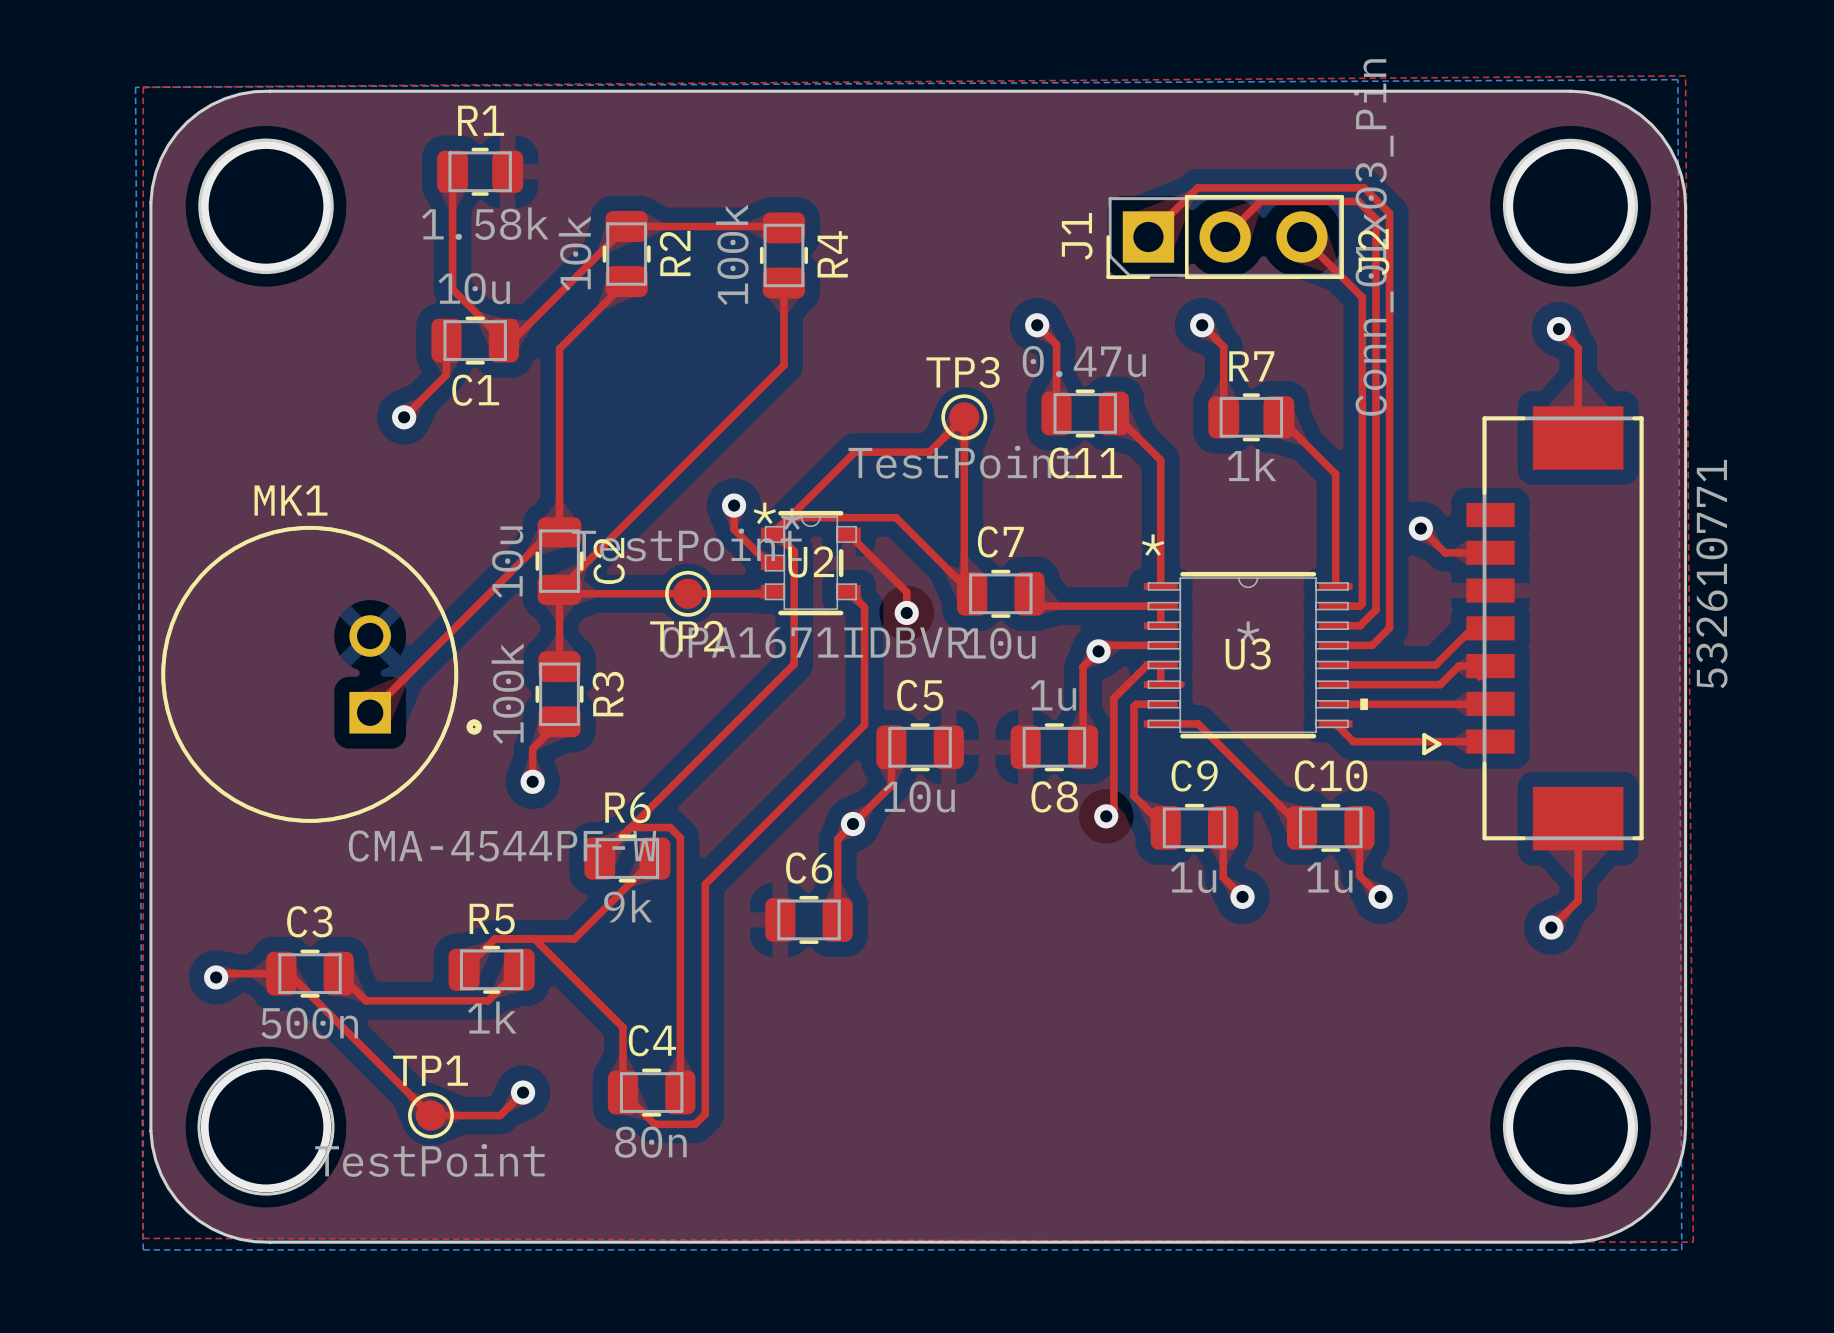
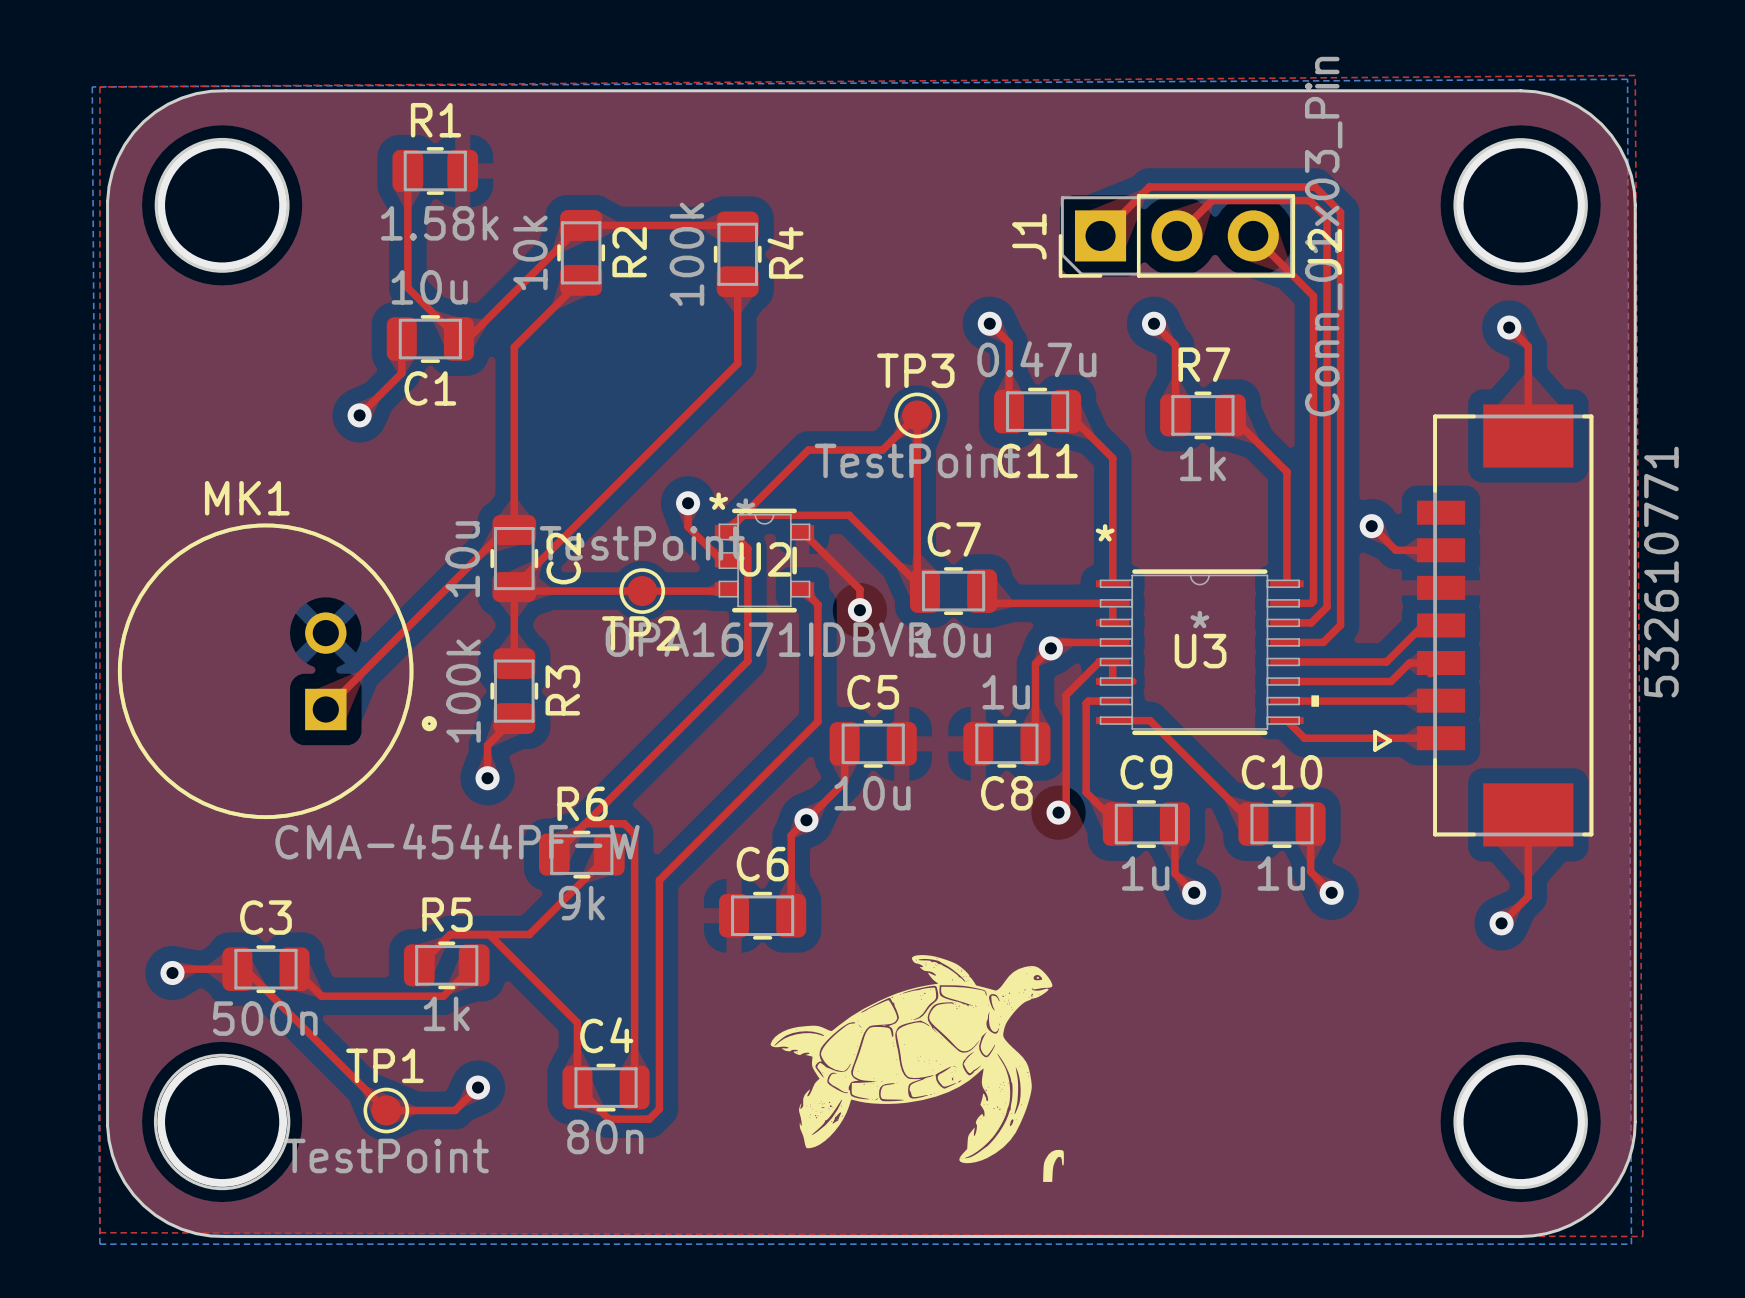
drawing: none -> [770, 955, 1064, 1182]

